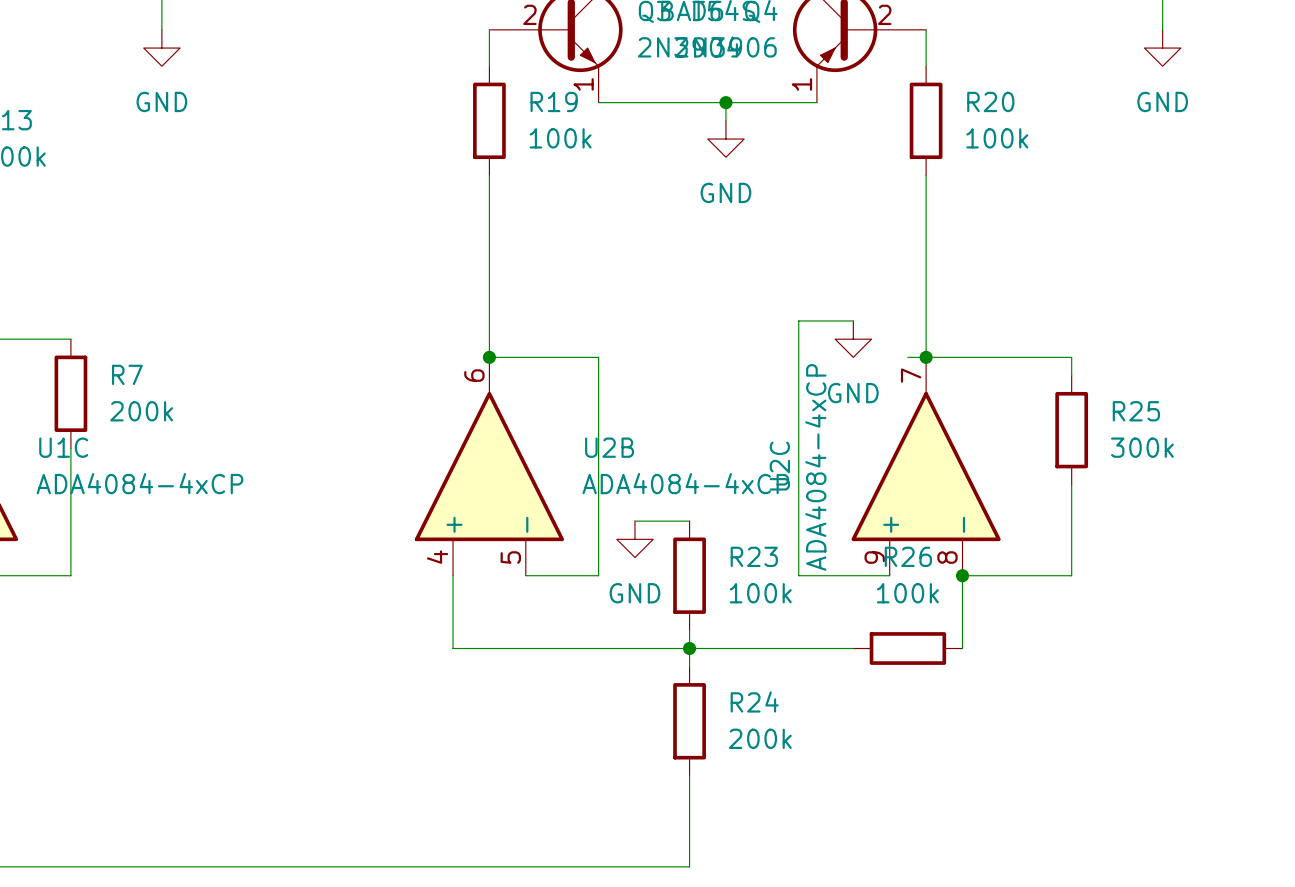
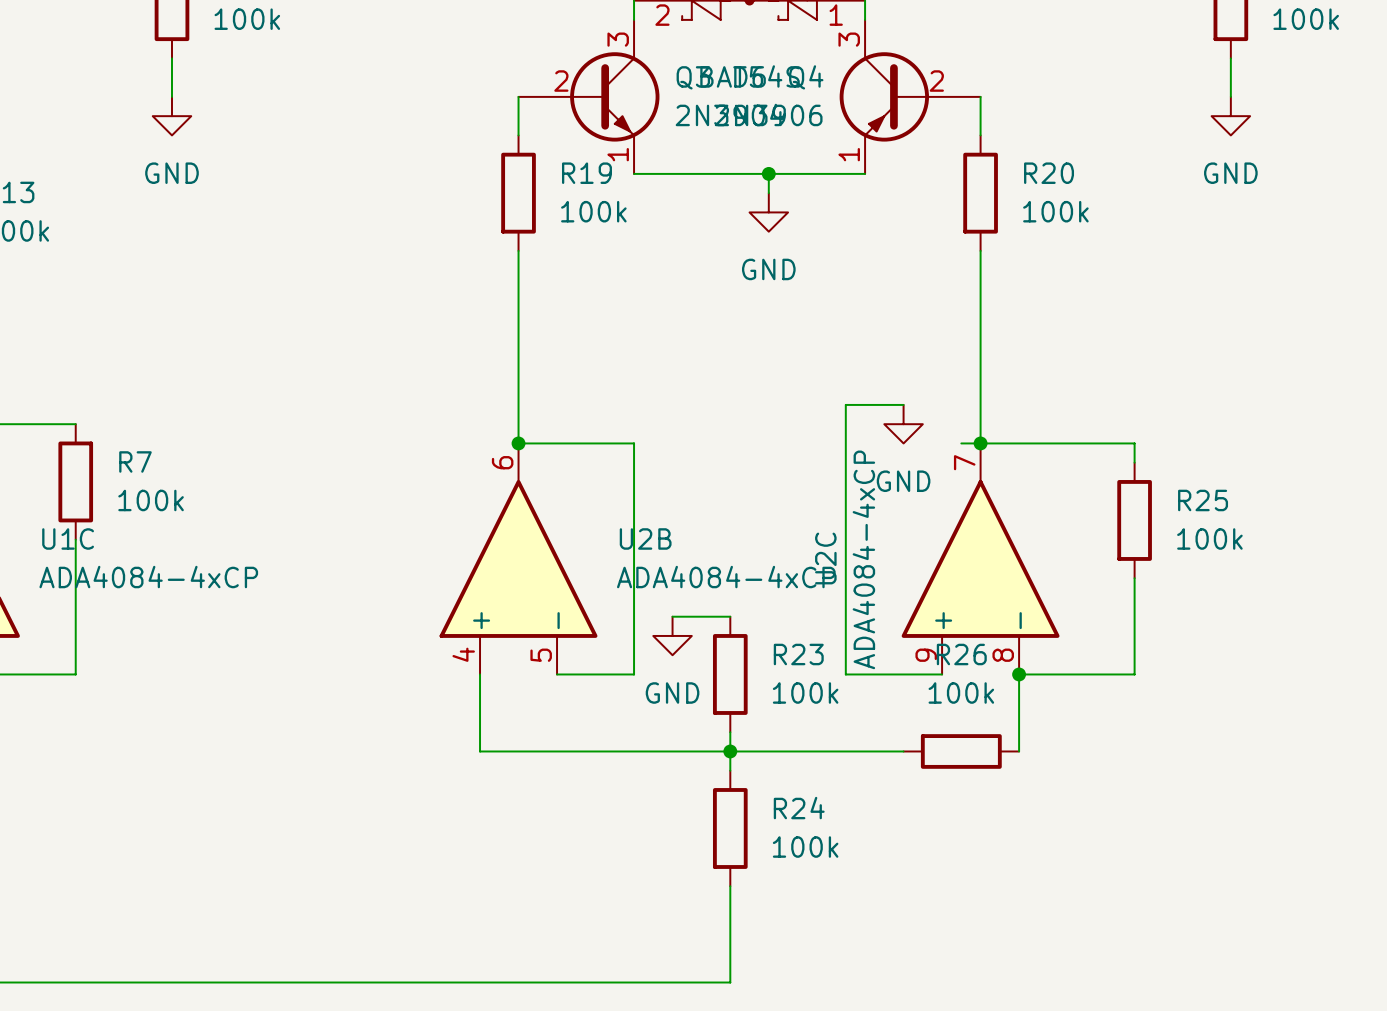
R7 value: 200k (141, 411) -> 100k (151, 500)
R25 value: 300k (1142, 447) -> 100k (1209, 538)
R24 value: 200k (760, 738) -> 100k (805, 847)

